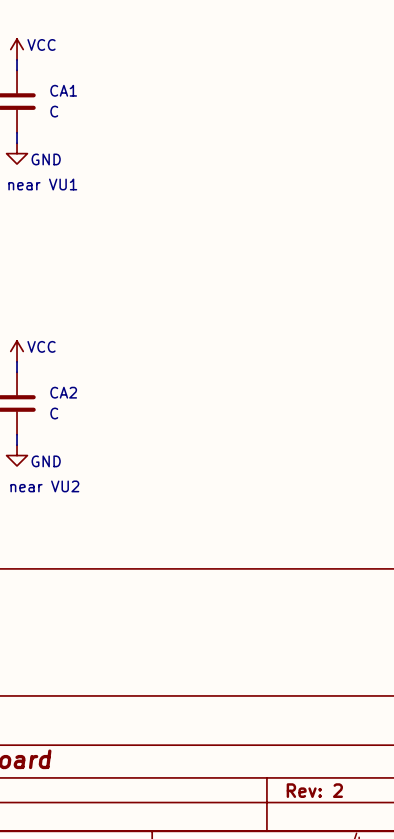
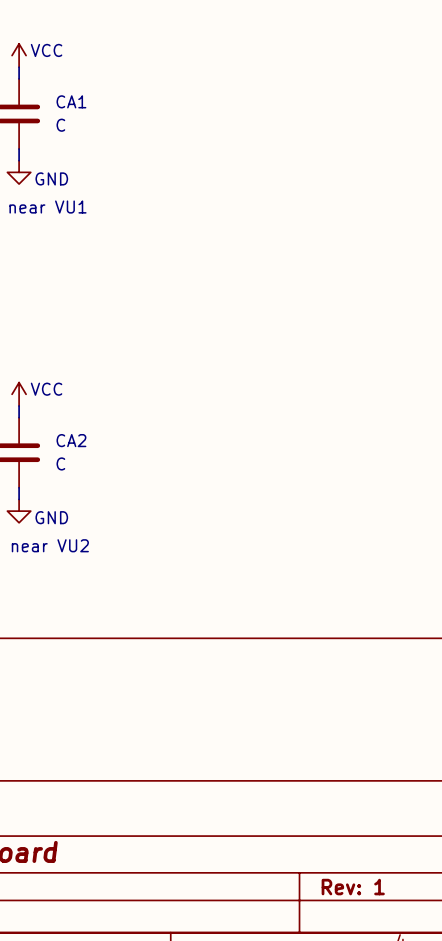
title block: Rev: 2 (314, 790) -> Rev: 1 (353, 887)

